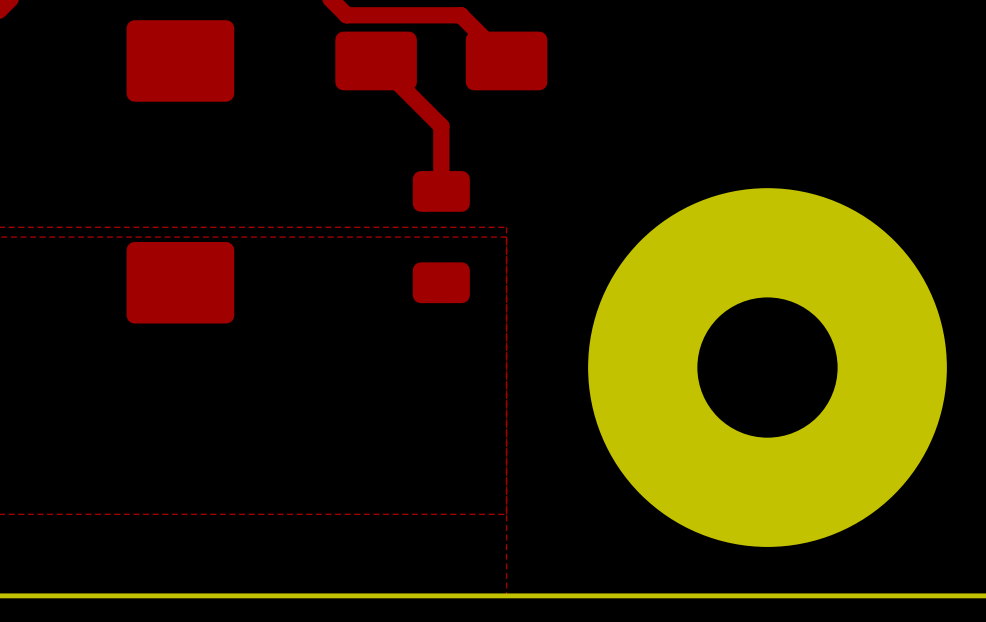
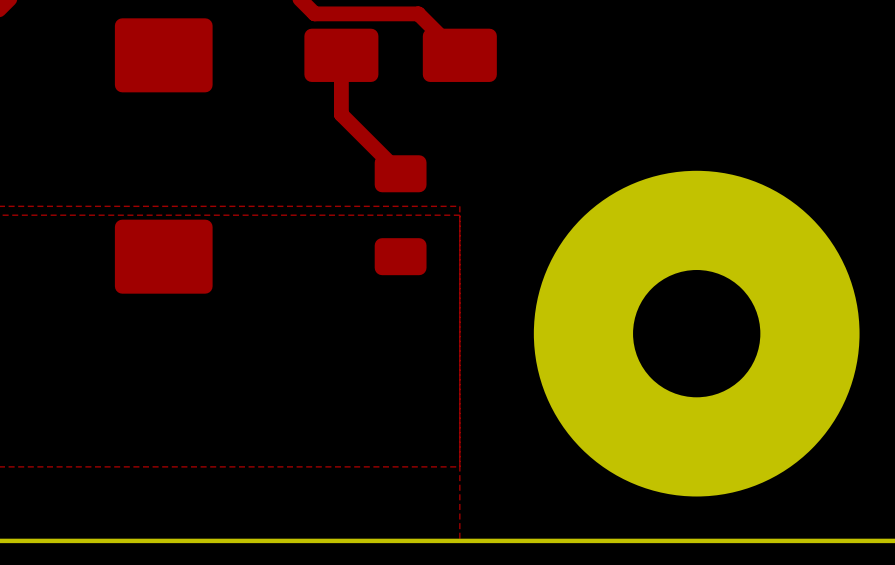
top track: (376, 60) (441, 126) (441, 191) -> (341, 55) (341, 114) (400, 173)

